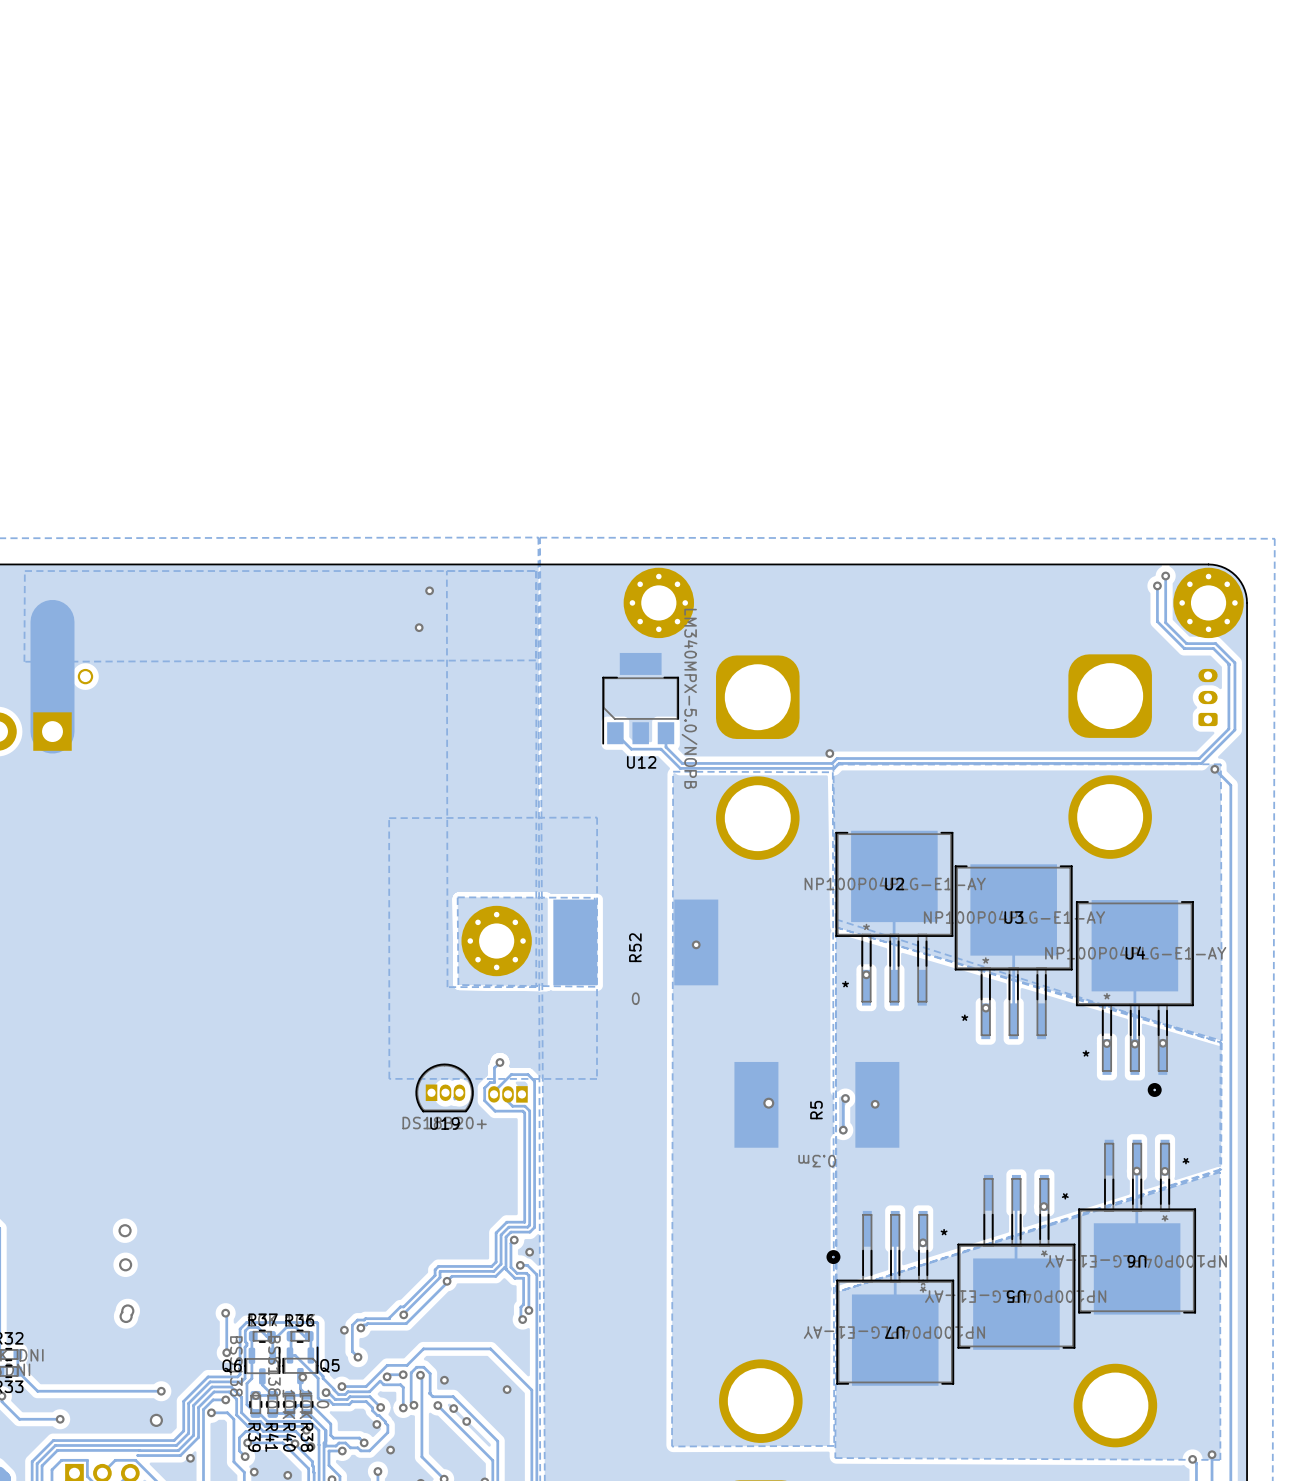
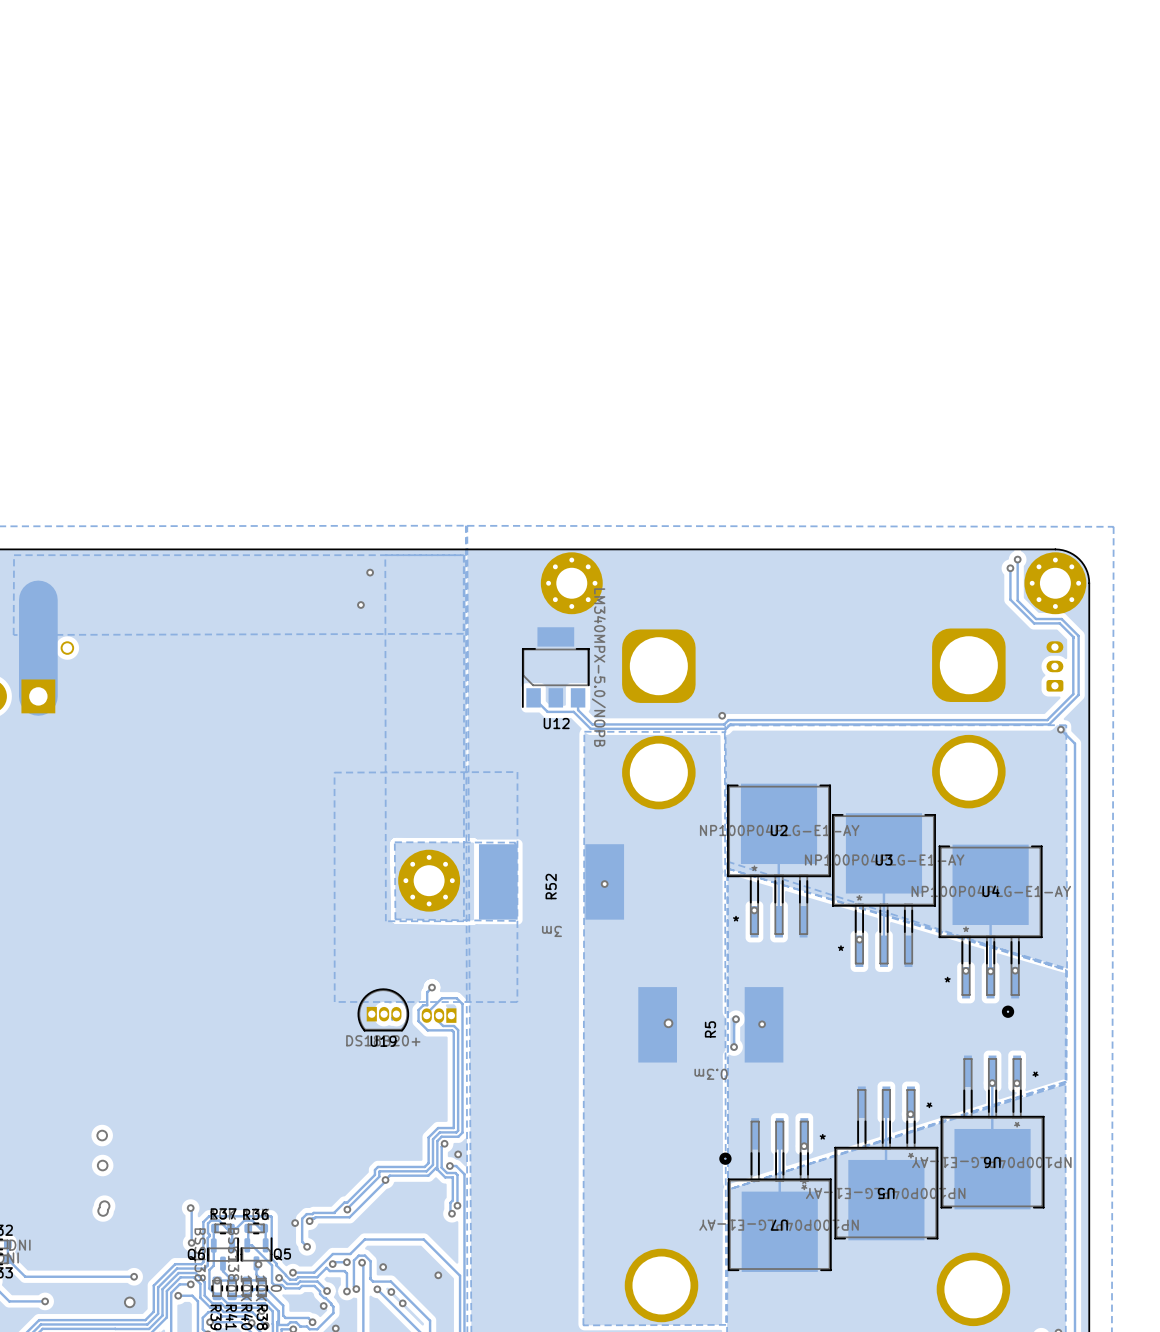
R52 value: 0 (635, 998) -> 3m (551, 931)

